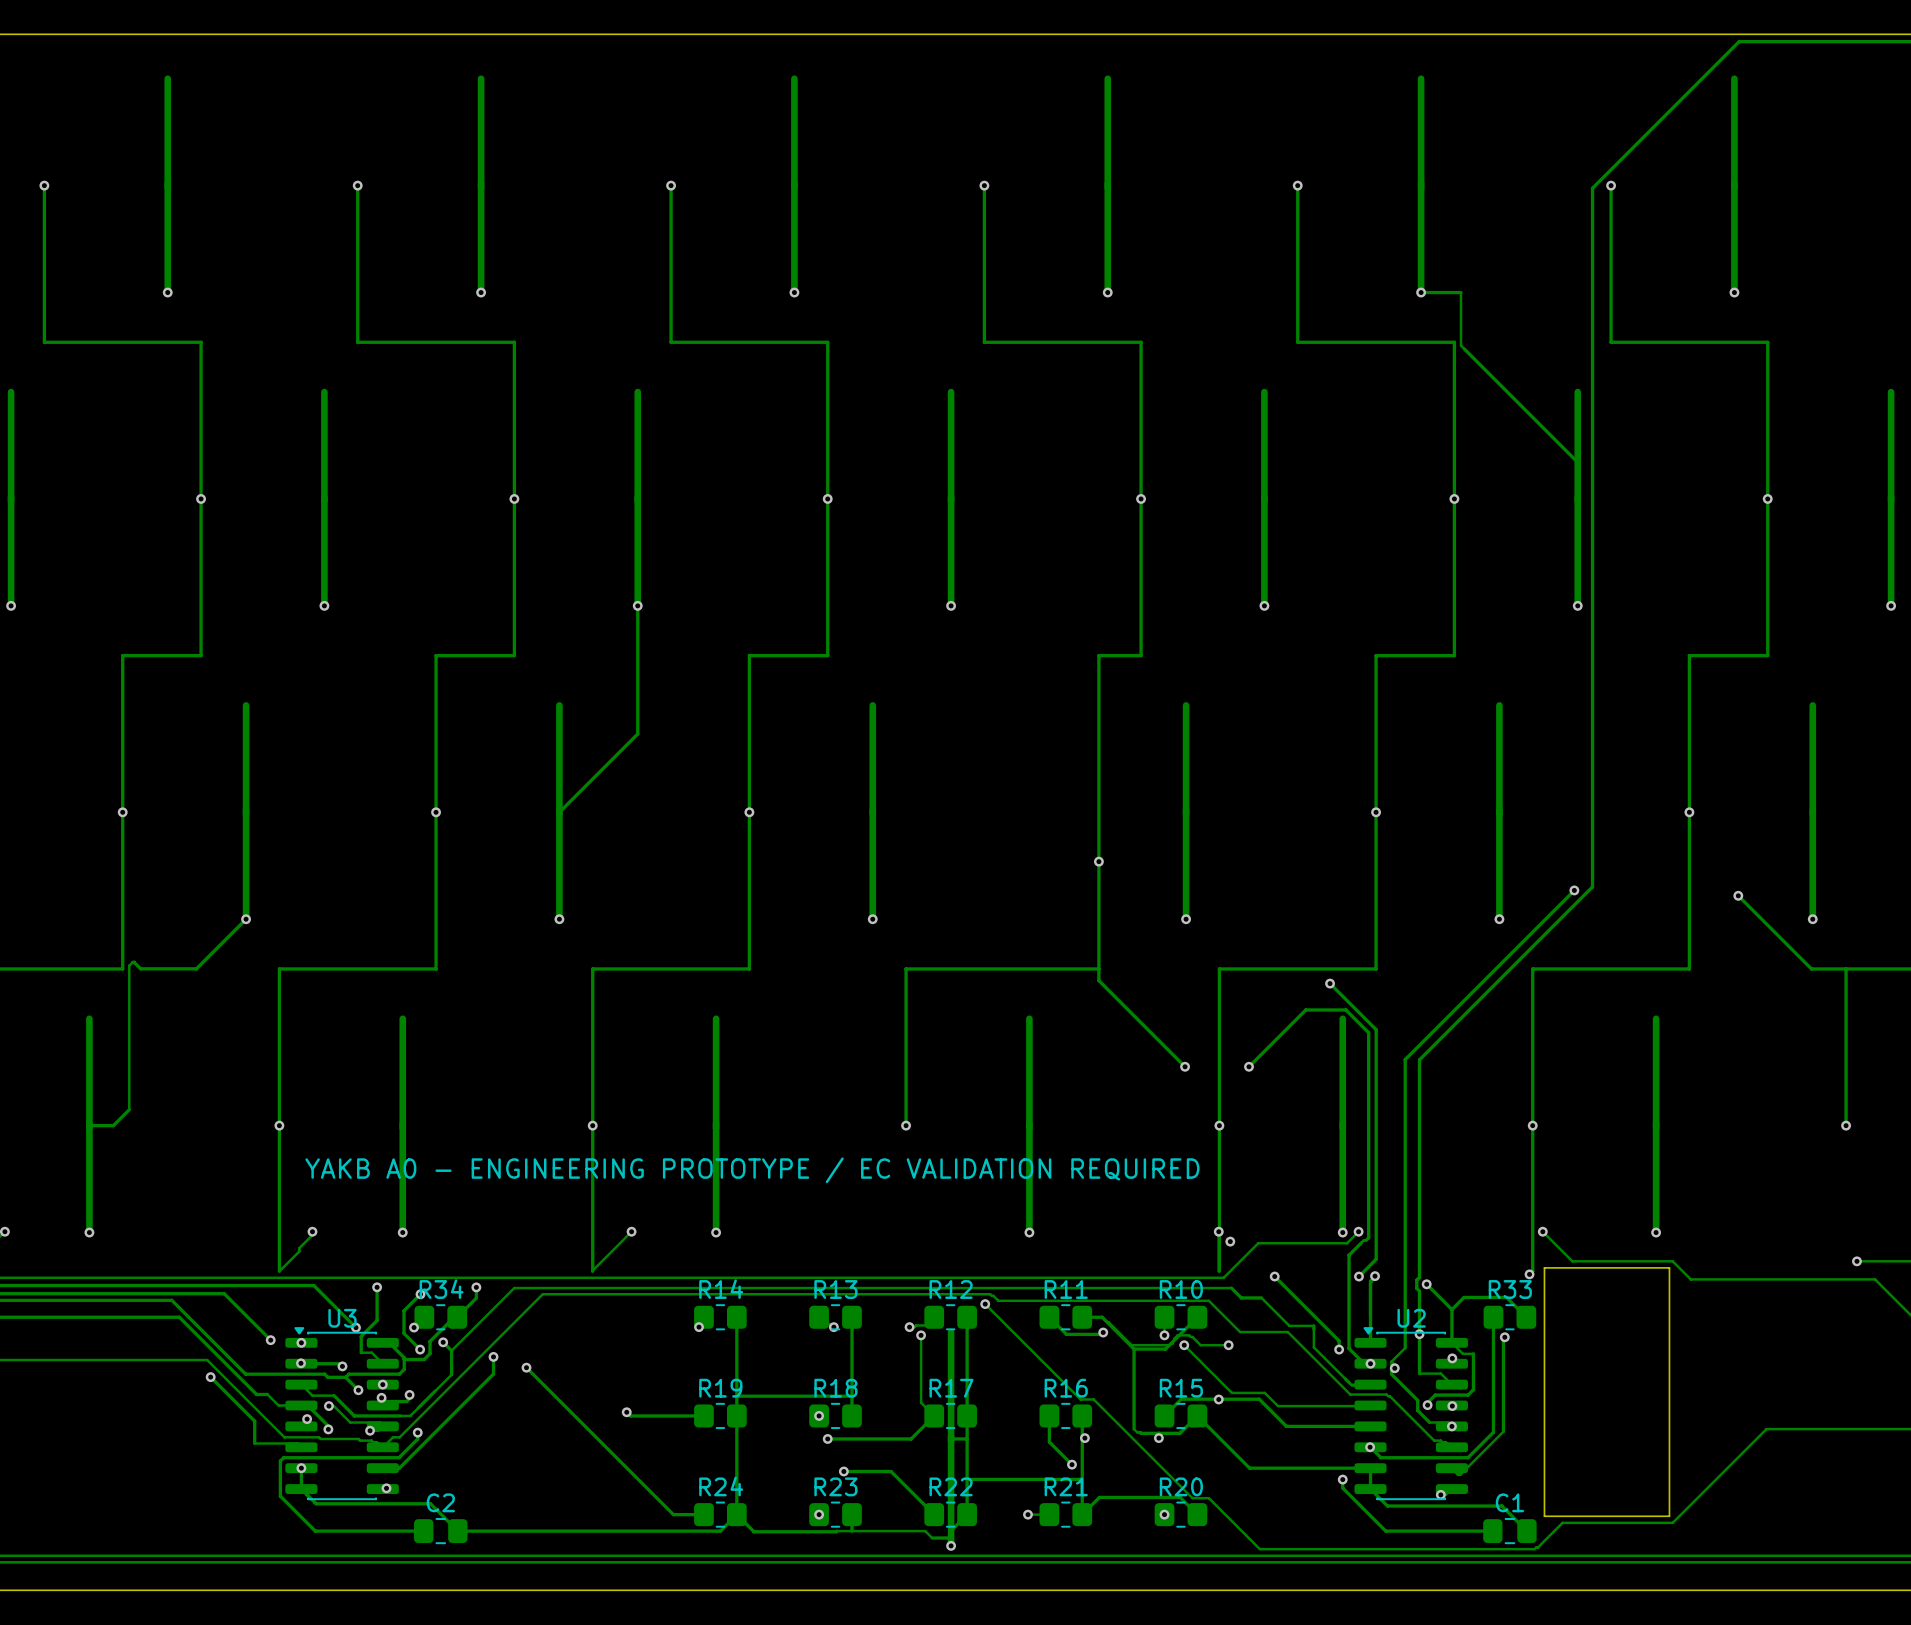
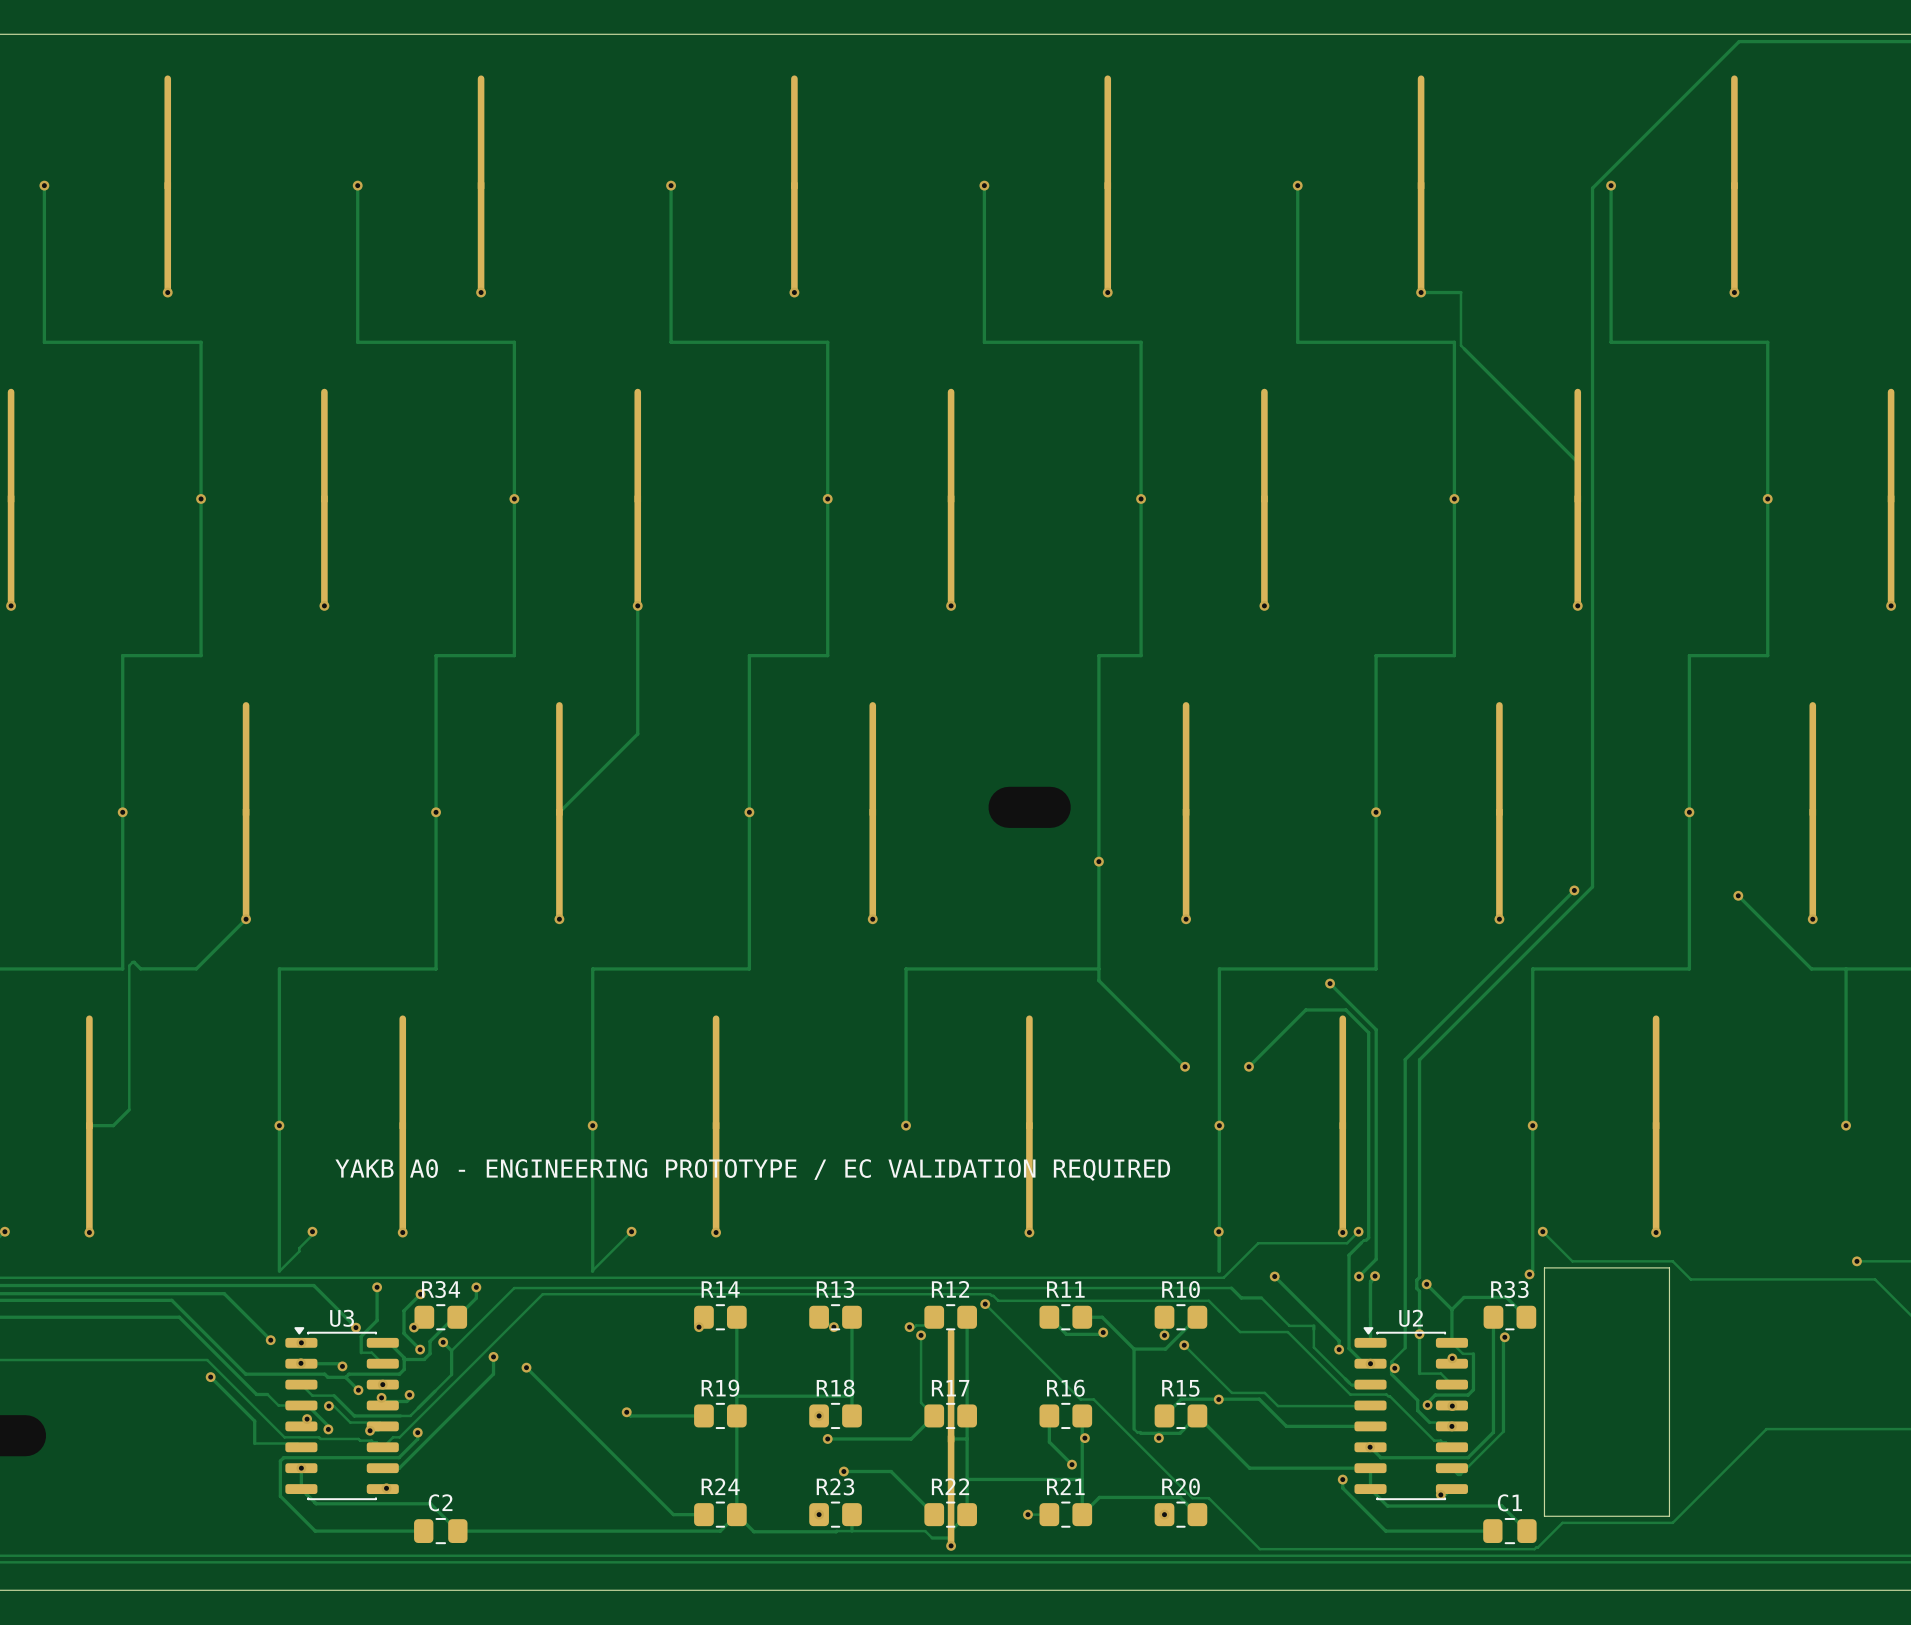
via: (1230, 1241) -> none
track: (1101, 1317) (1131, 1345) (1169, 1345) (1177, 1335) (1189, 1335) (1200, 1345) (1228, 1345) -> none
via: (1228, 1345) -> none

